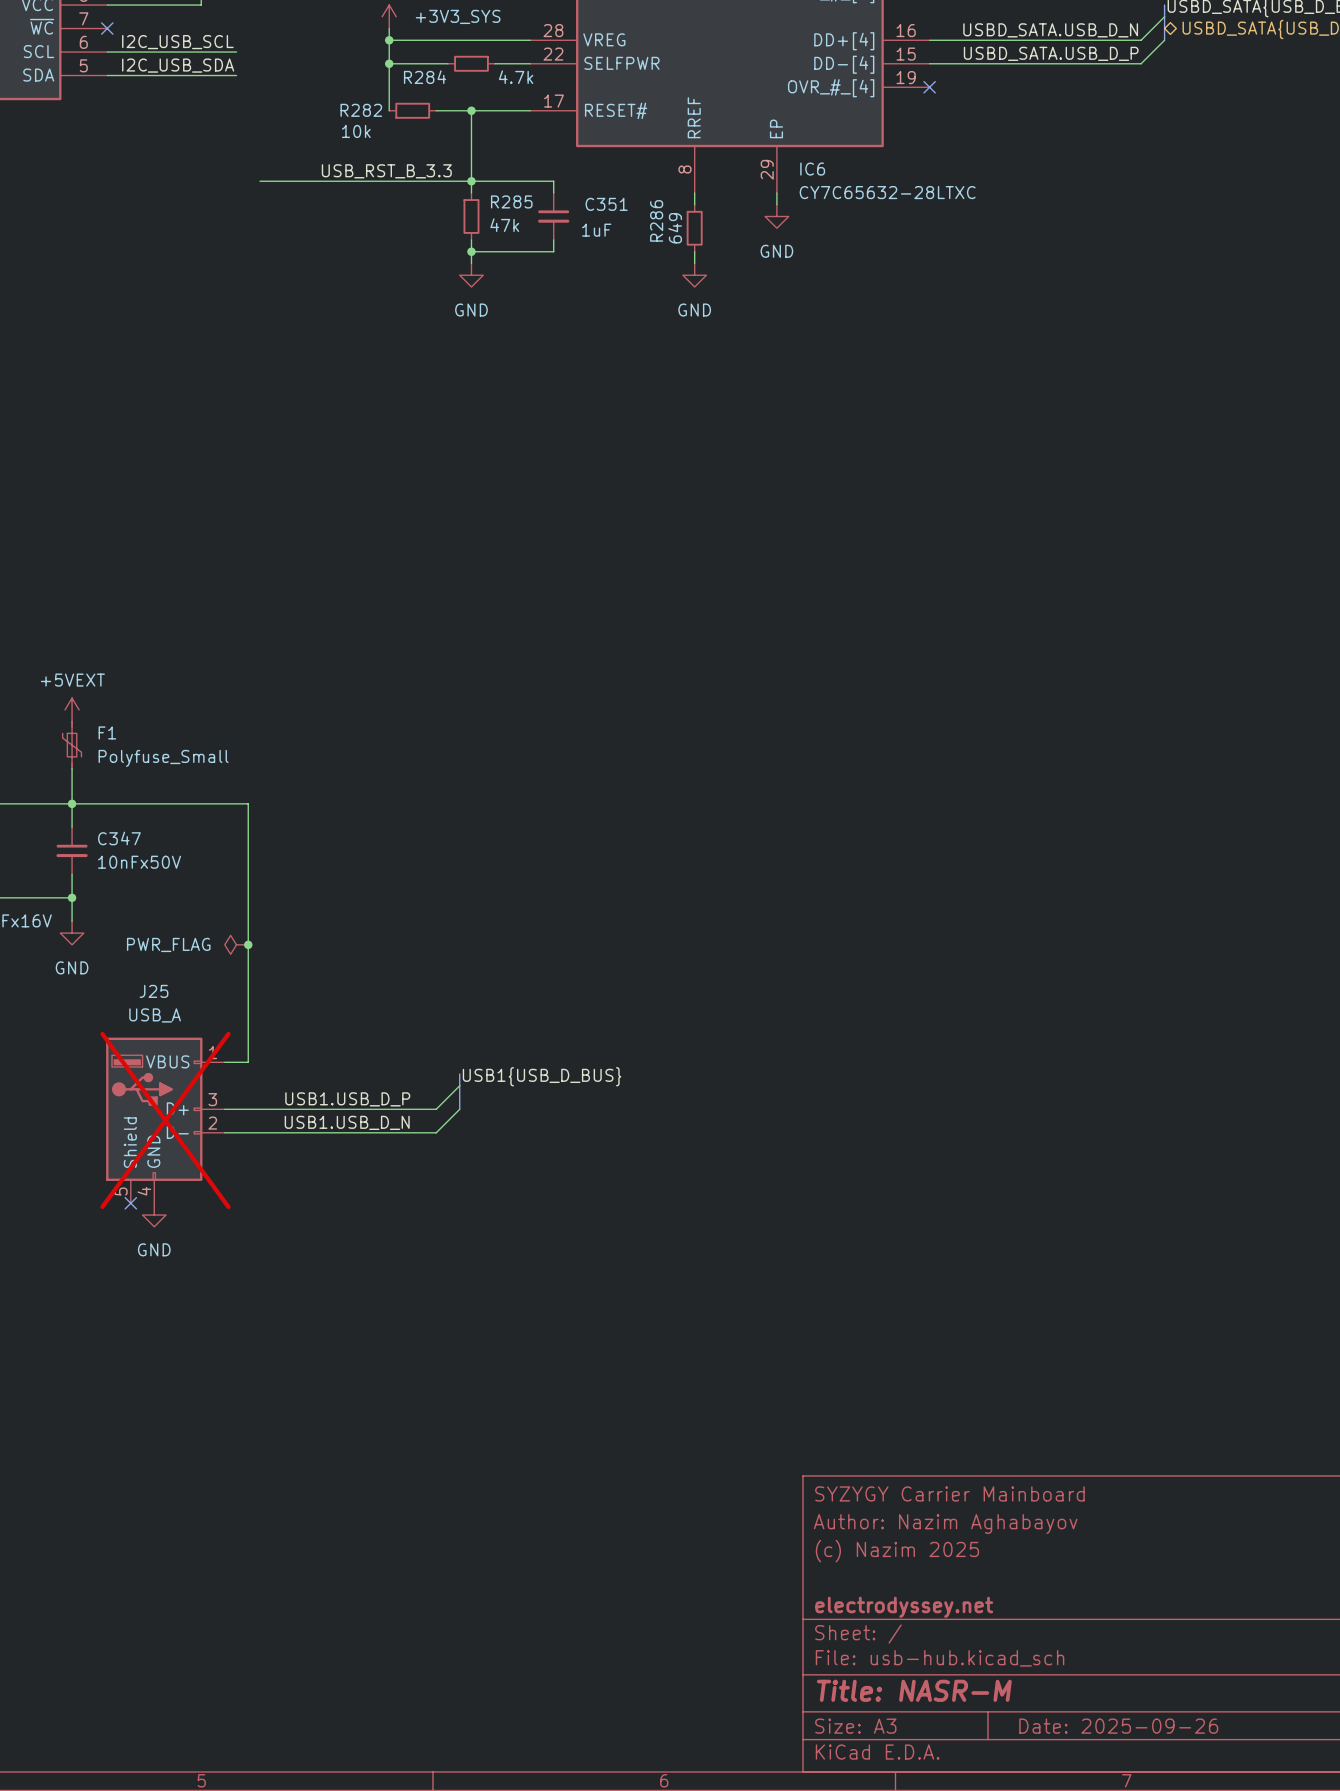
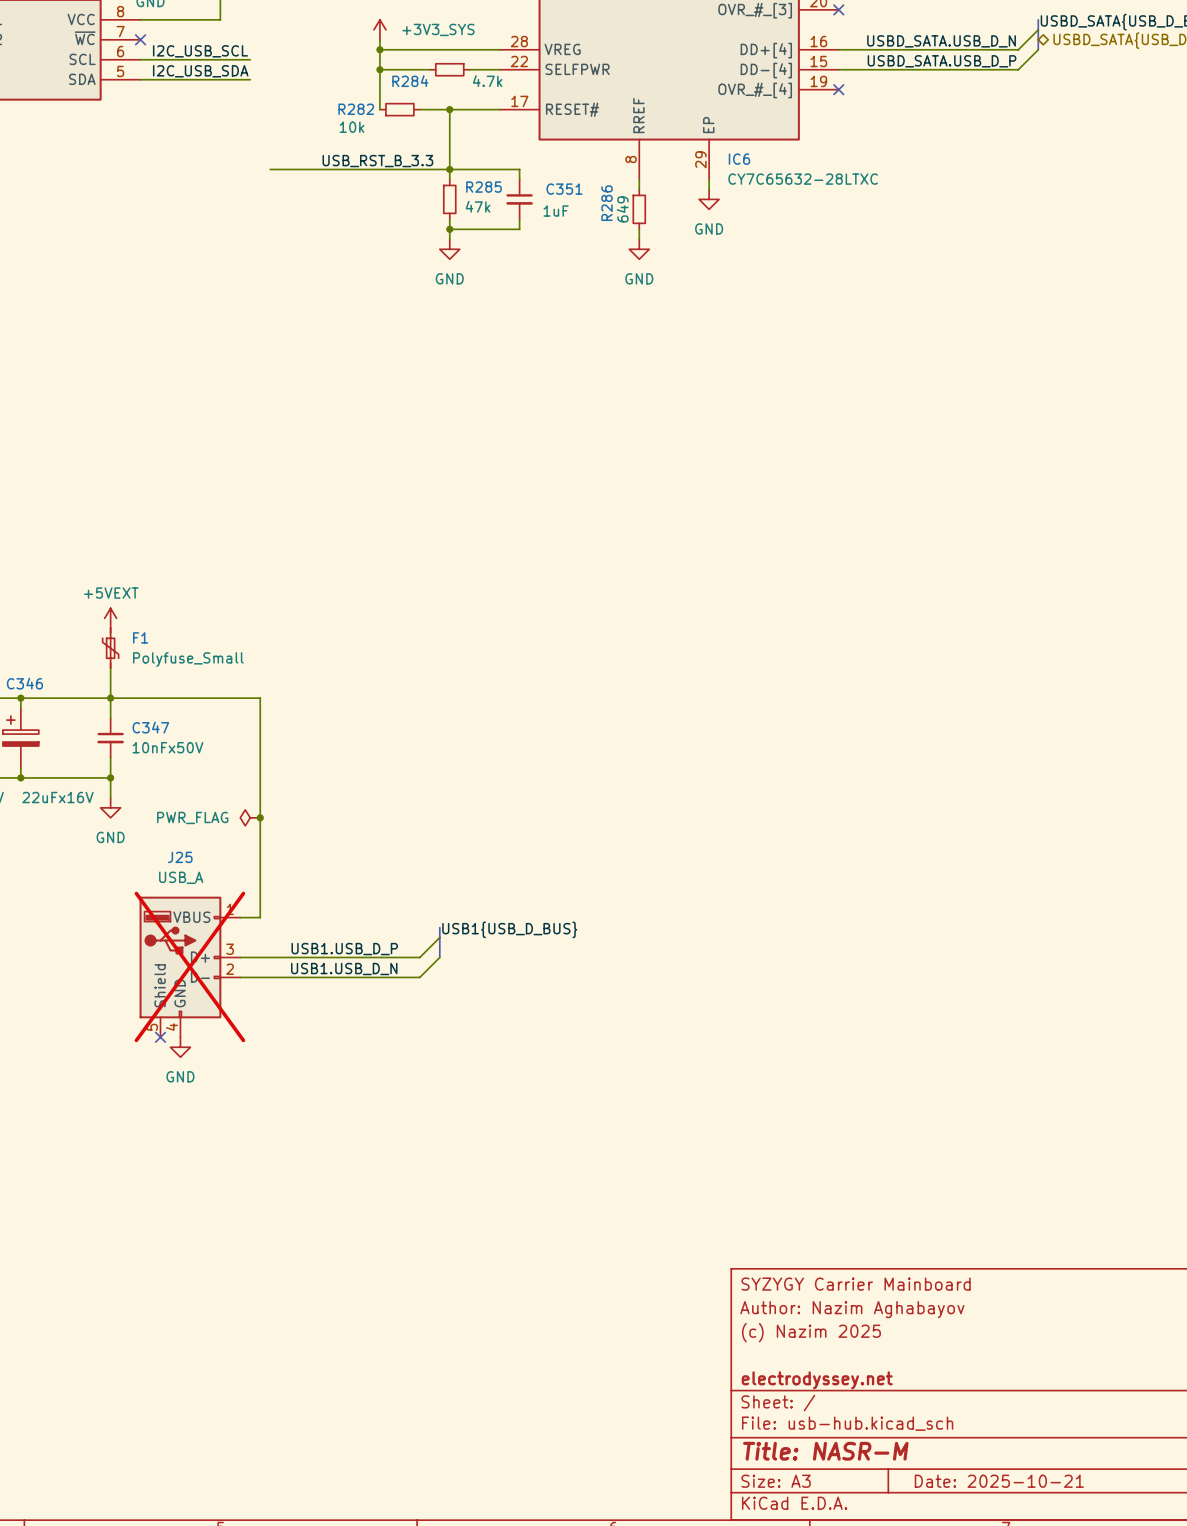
title block: Date: 2025-09-26 (1118, 1726) -> Date: 2025-10-21 (999, 1481)

